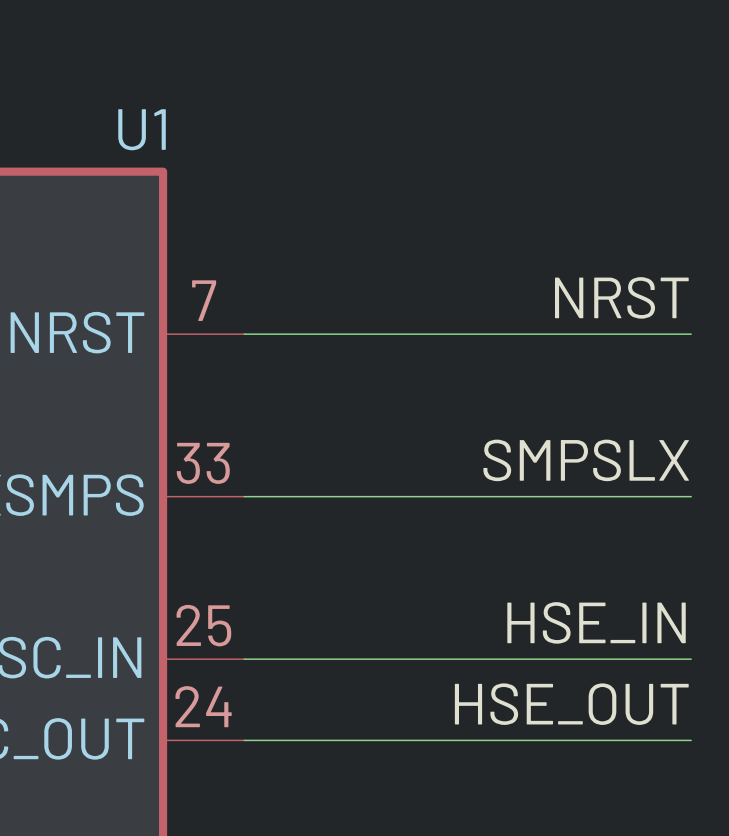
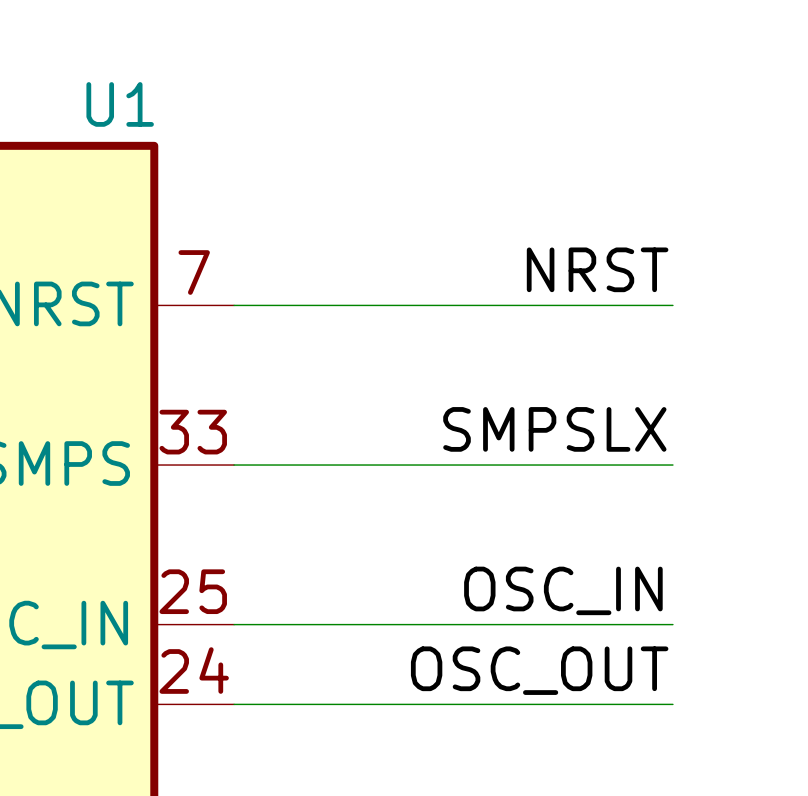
label: HSE_IN (596, 622) -> OSC_IN (563, 590)
label: HSE_OUT (571, 704) -> OSC_OUT (539, 670)

